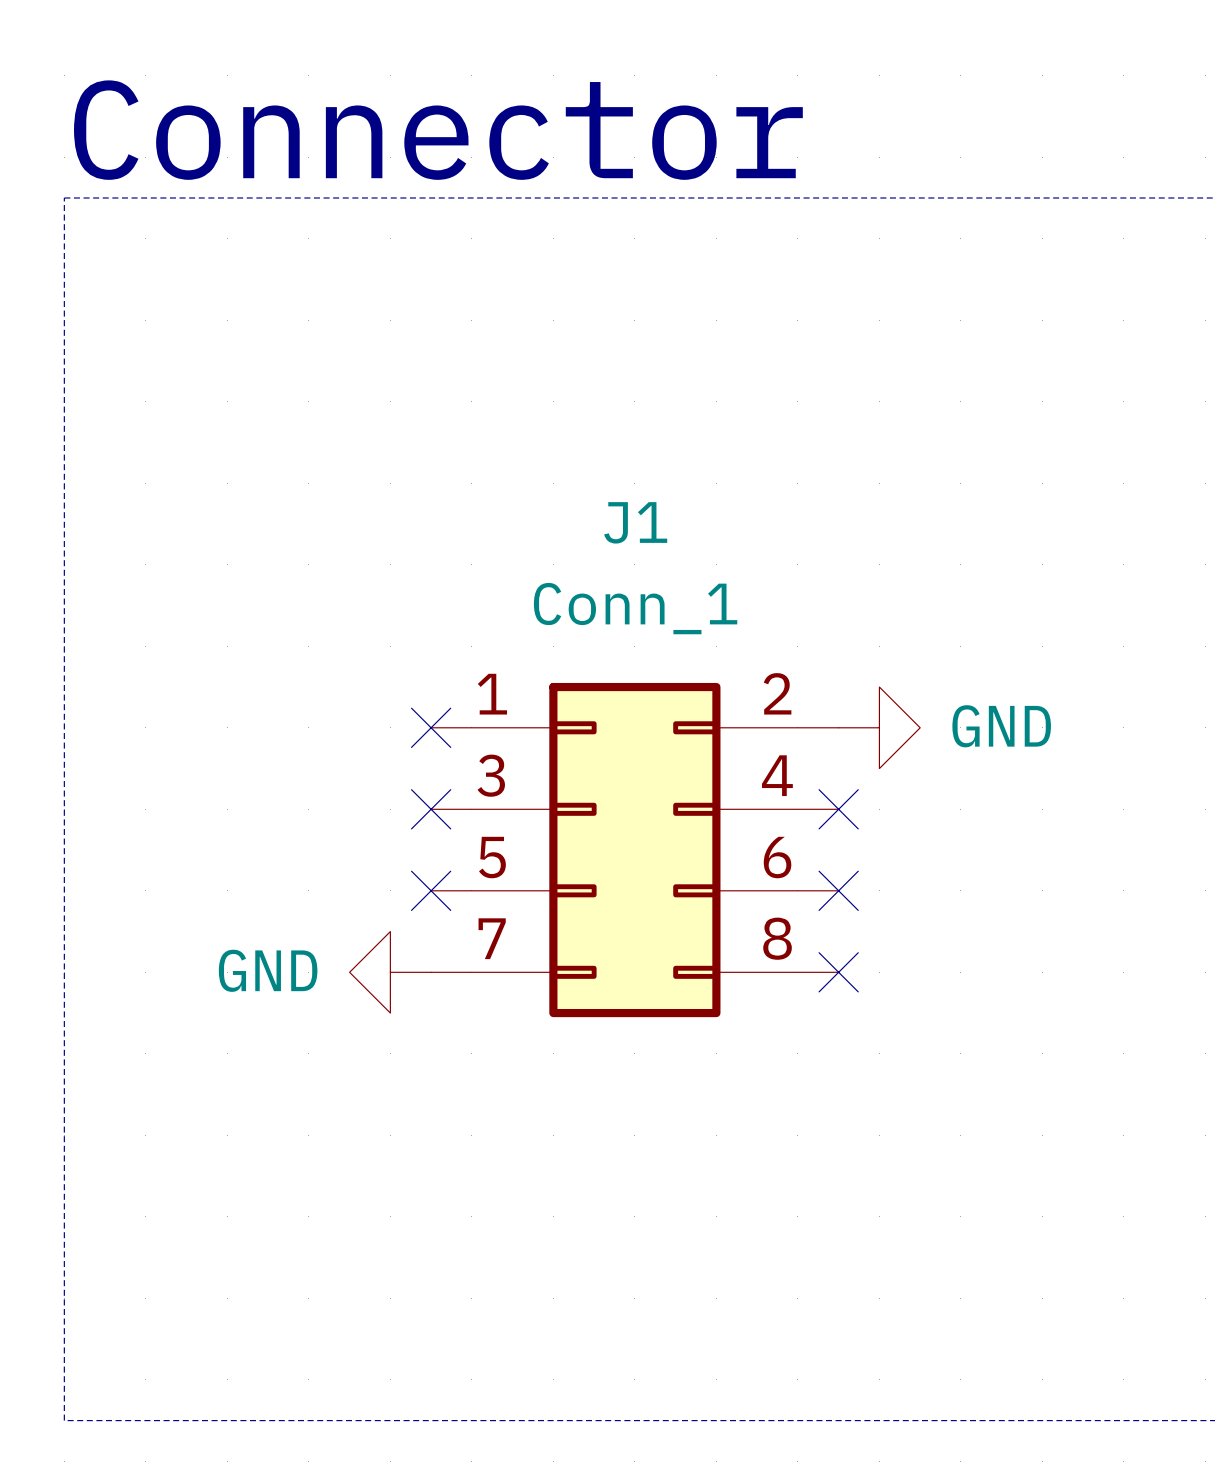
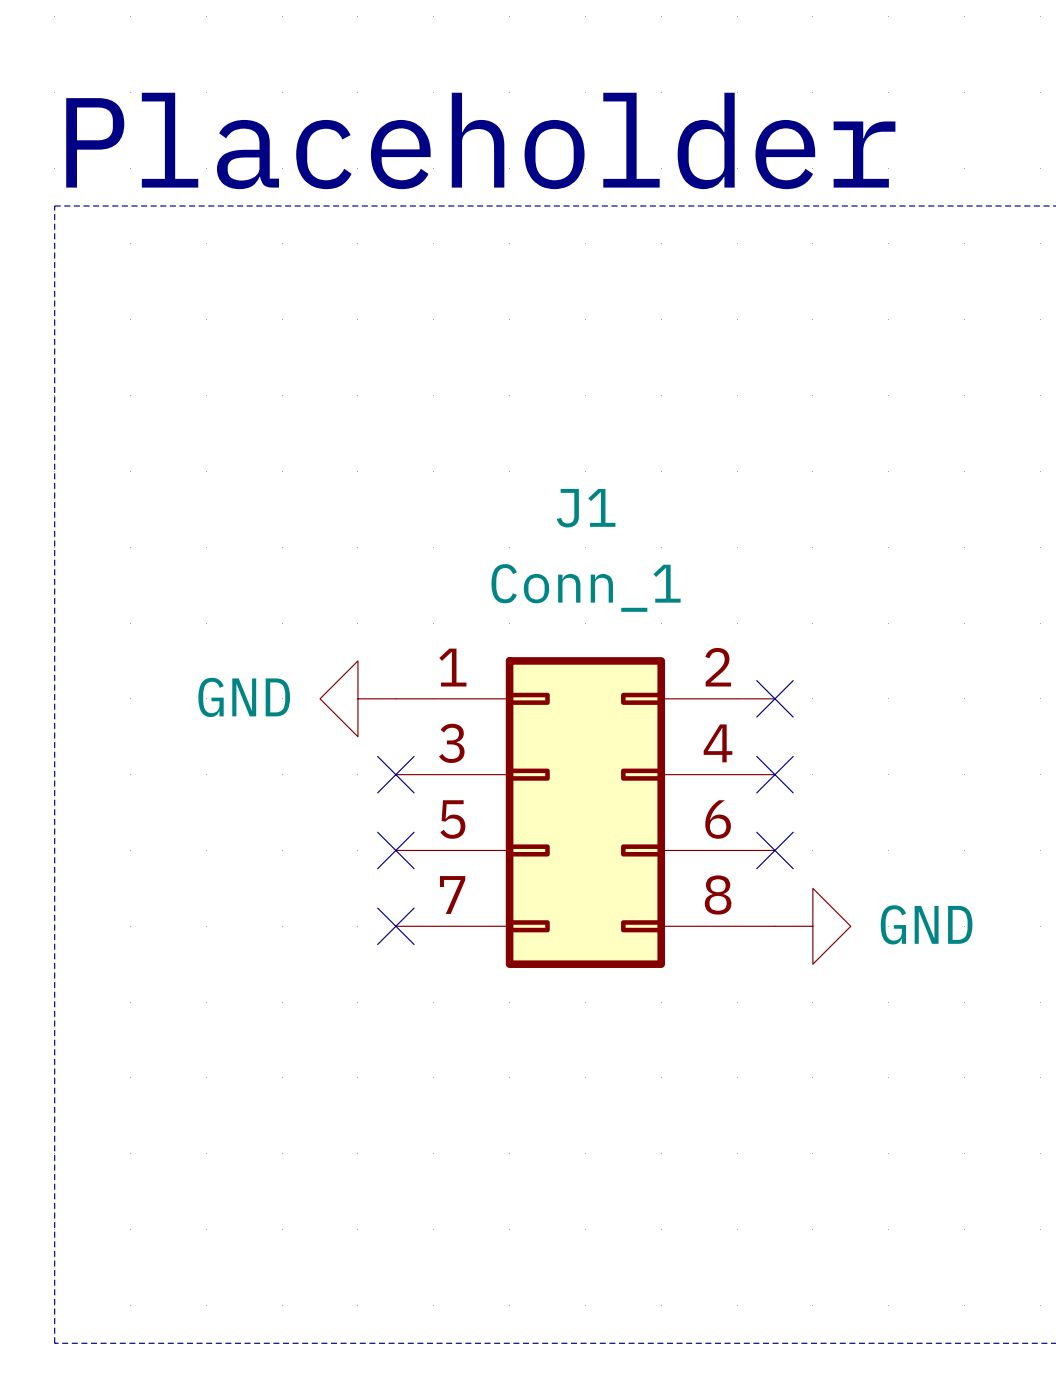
text: Connector (438, 130) -> Placeholder (480, 140)
power symbol: none -> GND (357, 698)
no-connect mark: (431, 727) -> none
no-connect mark: none -> (774, 698)
power symbol: GND (879, 727) -> none
power symbol: GND (390, 972) -> none
no-connect mark: none -> (395, 926)
no-connect mark: (838, 972) -> none
power symbol: none -> GND (812, 926)

